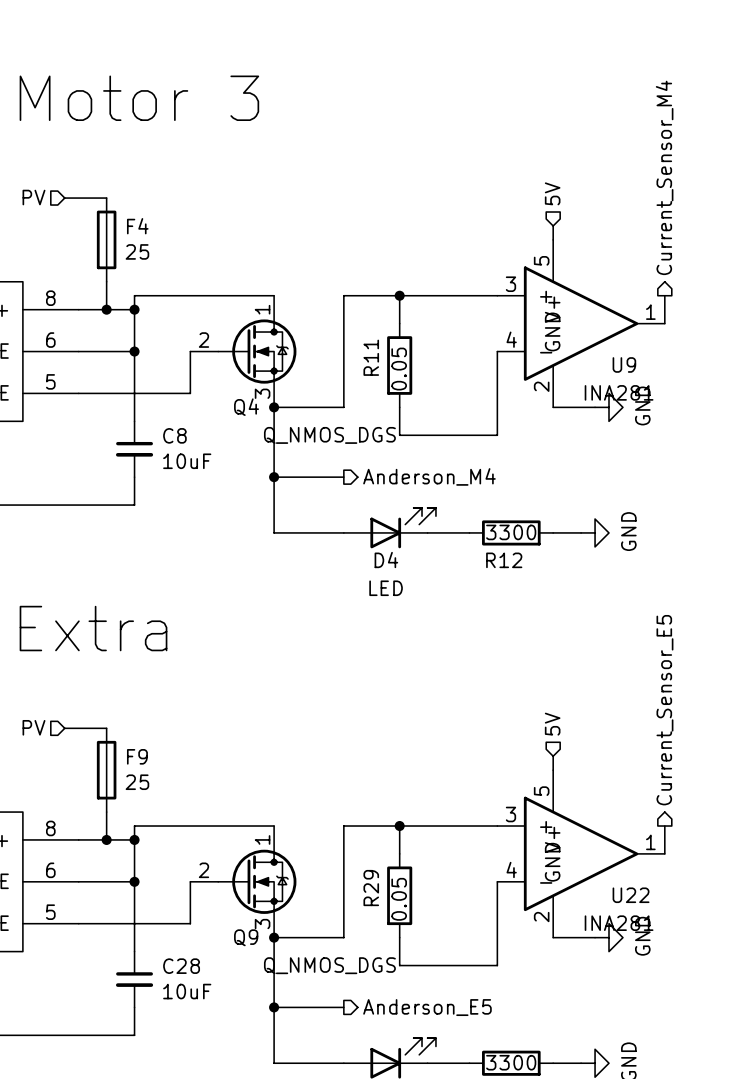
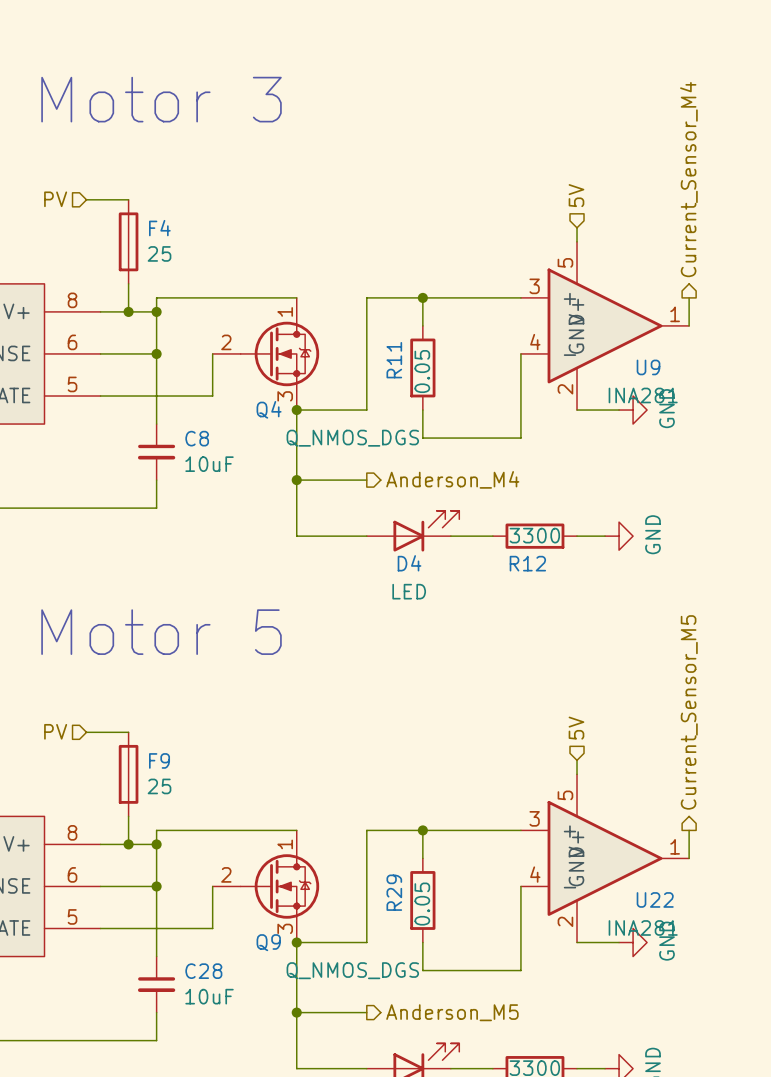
text: Extra (93, 628) -> Motor 5 (161, 632)
hierarchical label: Current_Sensor_E5 (664, 710) -> Current_Sensor_M5 (689, 712)
hierarchical label: Anderson_E5 (427, 1007) -> Anderson_M5 (452, 1012)

